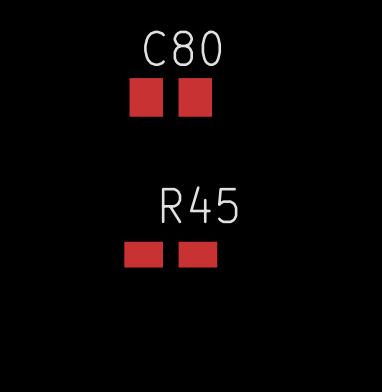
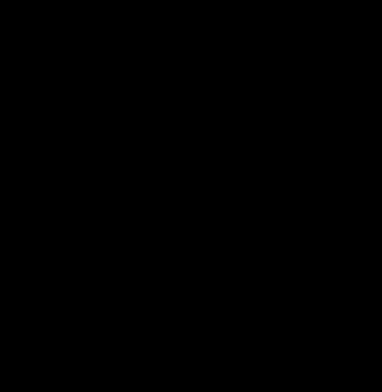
C80: (170, 97) -> none
R45: (170, 254) -> none

